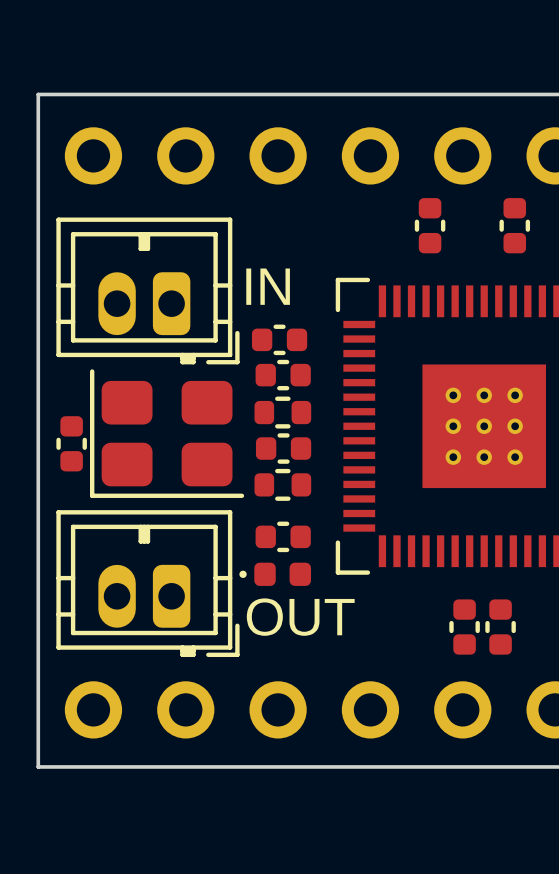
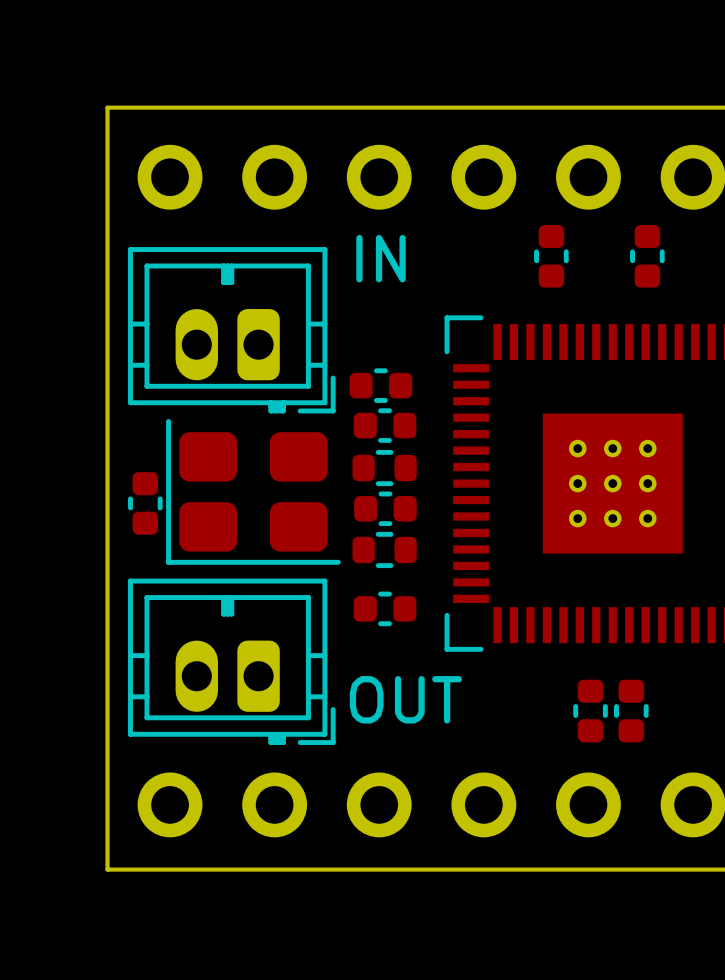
text position: IN (268, 286) -> IN (381, 258)
part: (275, 574) -> none

